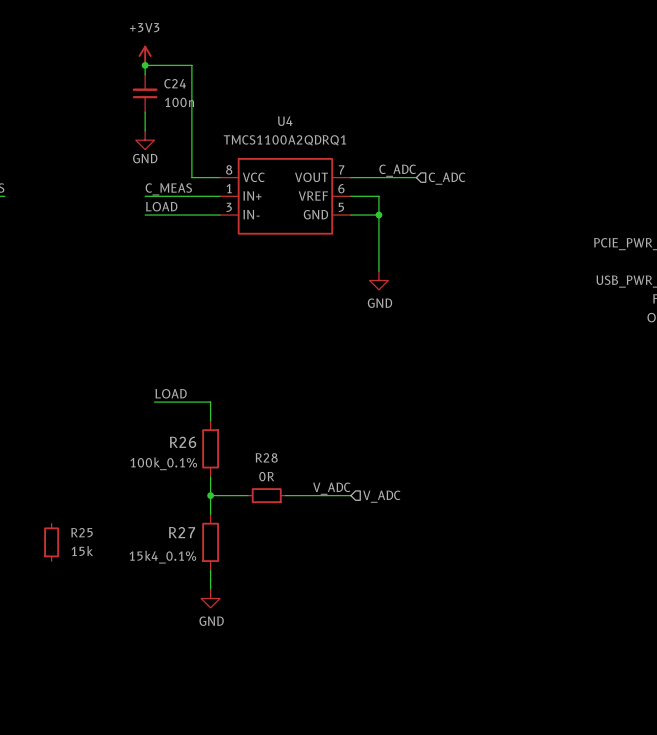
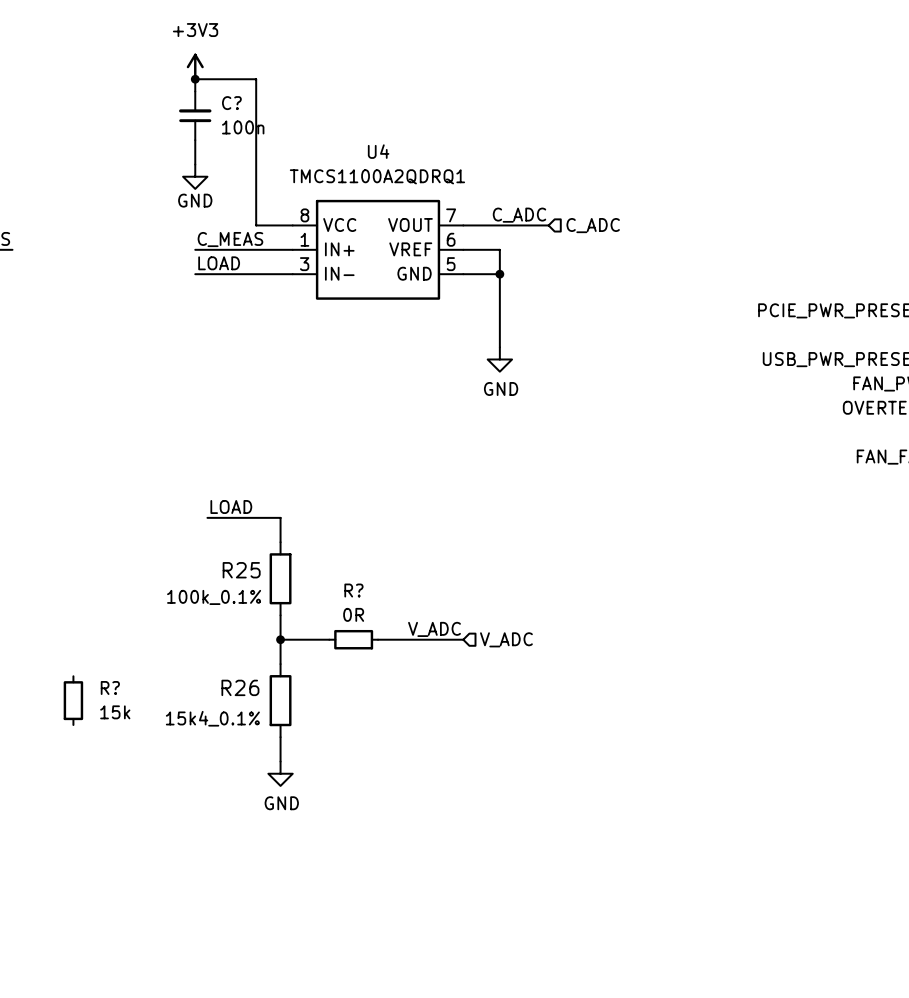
C24 name: C24 (175, 83) -> C? (231, 103)
R26 name: R26 (183, 442) -> R25 (241, 570)
R28 name: R28 (266, 457) -> R? (353, 590)
R25 name: R25 (82, 532) -> R? (110, 687)
R27 name: R27 (182, 532) -> R26 (240, 687)

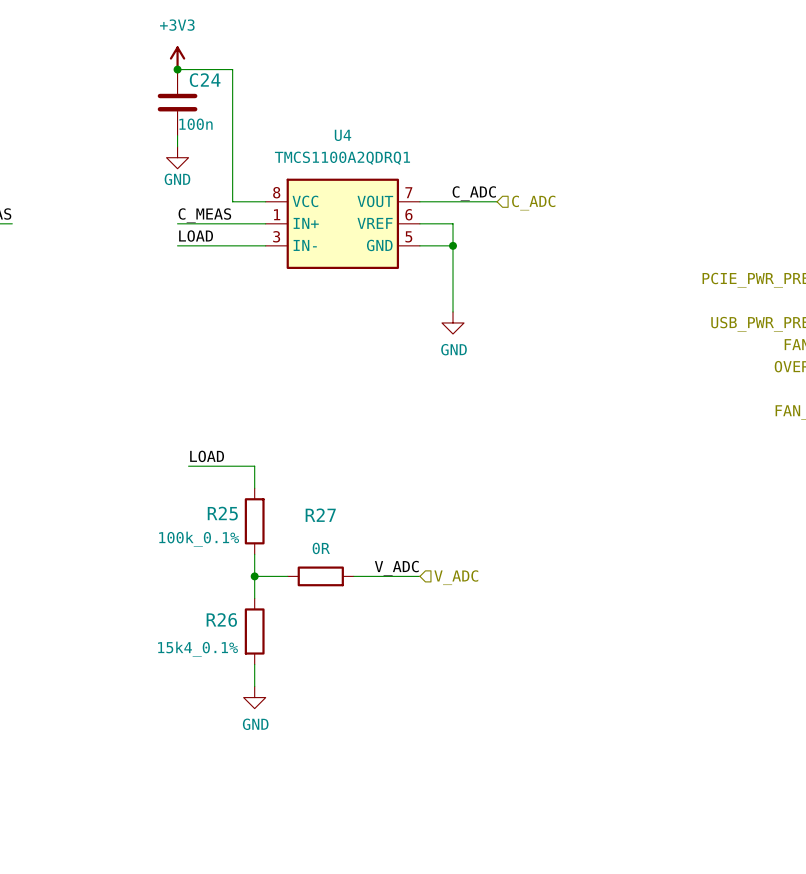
C?: (195, 115) -> none
C24: none -> (177, 102)
R?: (353, 639) -> none
R27: none -> (320, 576)
R?: (73, 700) -> none

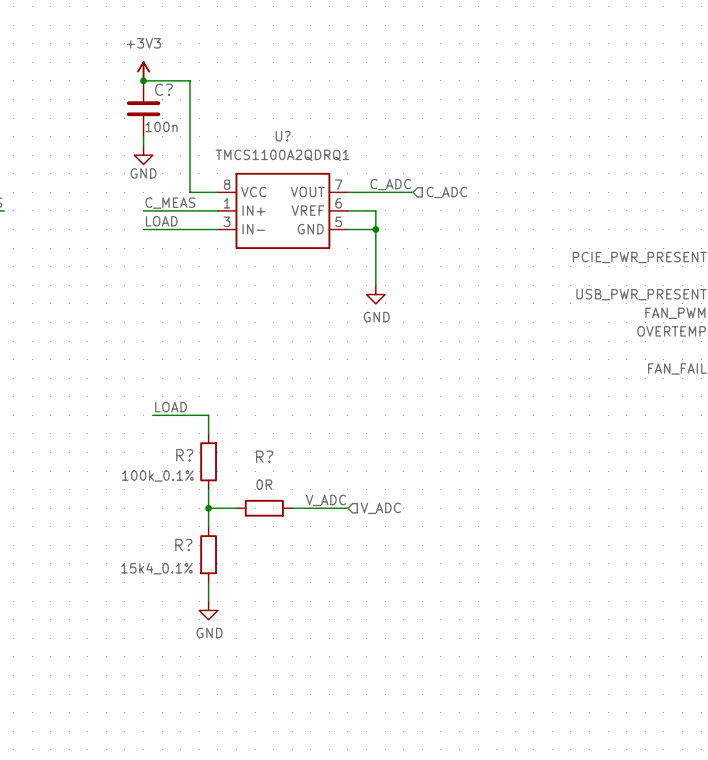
C24 name: C24 (205, 80) -> C? (163, 89)
U4 name: U4 (343, 135) -> U? (283, 136)
R25 name: R25 (222, 513) -> R? (184, 455)
R27 name: R27 (320, 515) -> R? (264, 456)
R26 name: R26 (221, 619) -> R? (183, 544)

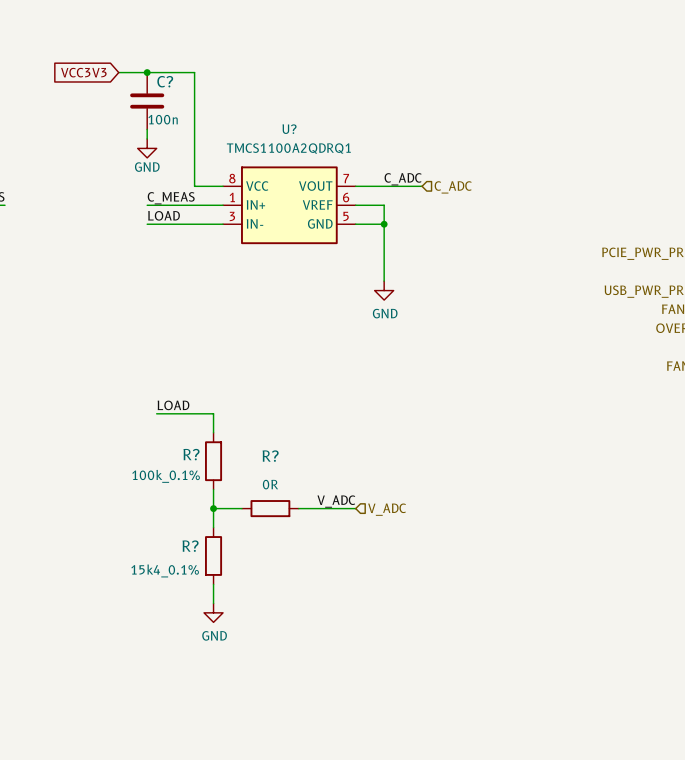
power symbol: +3V3 (143, 71) -> none
global label: none -> VCC3V3 (83, 72)
wire: none -> (118, 72) (147, 72)

